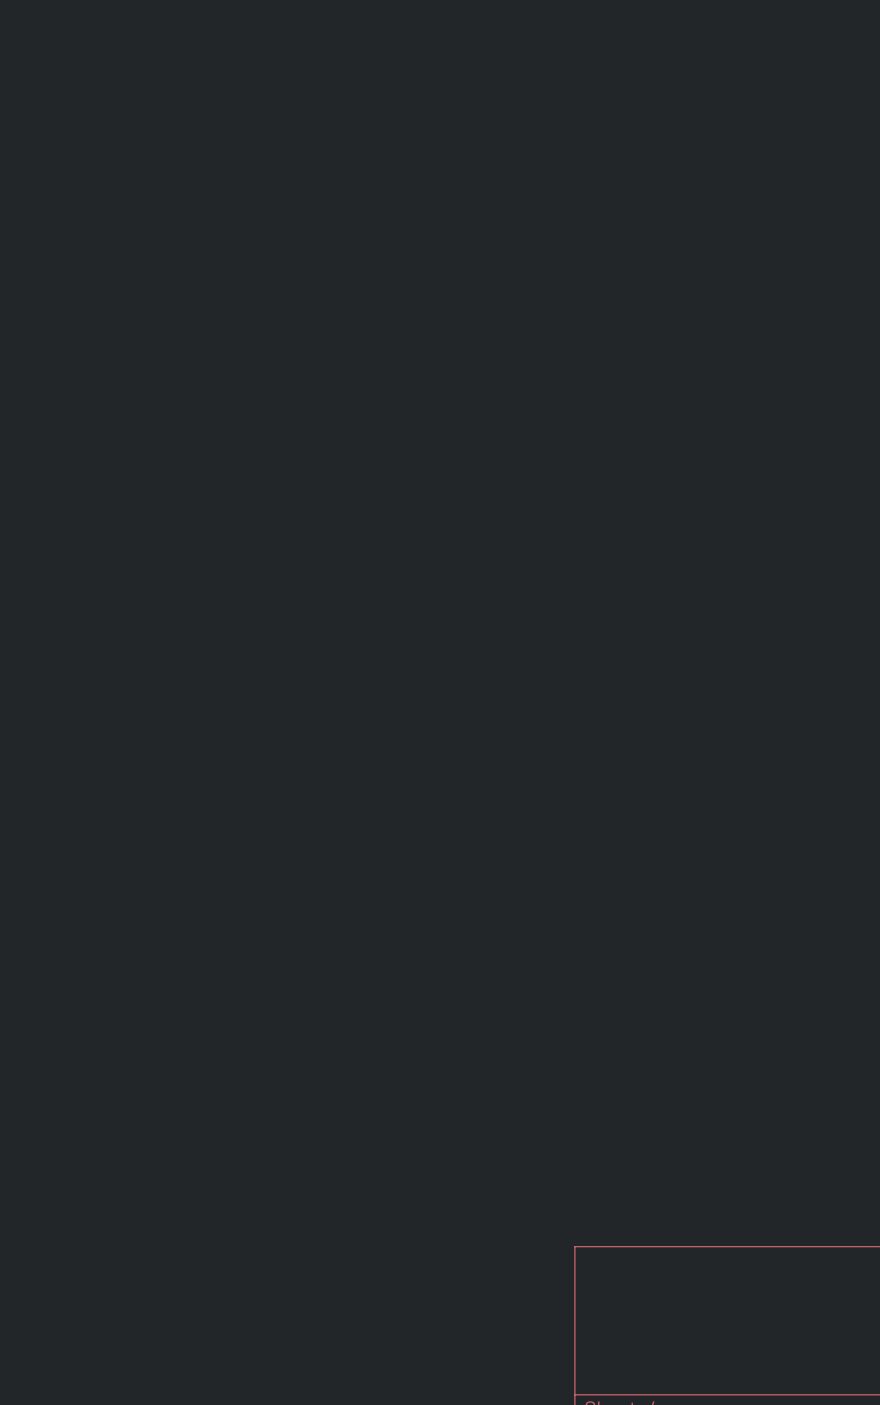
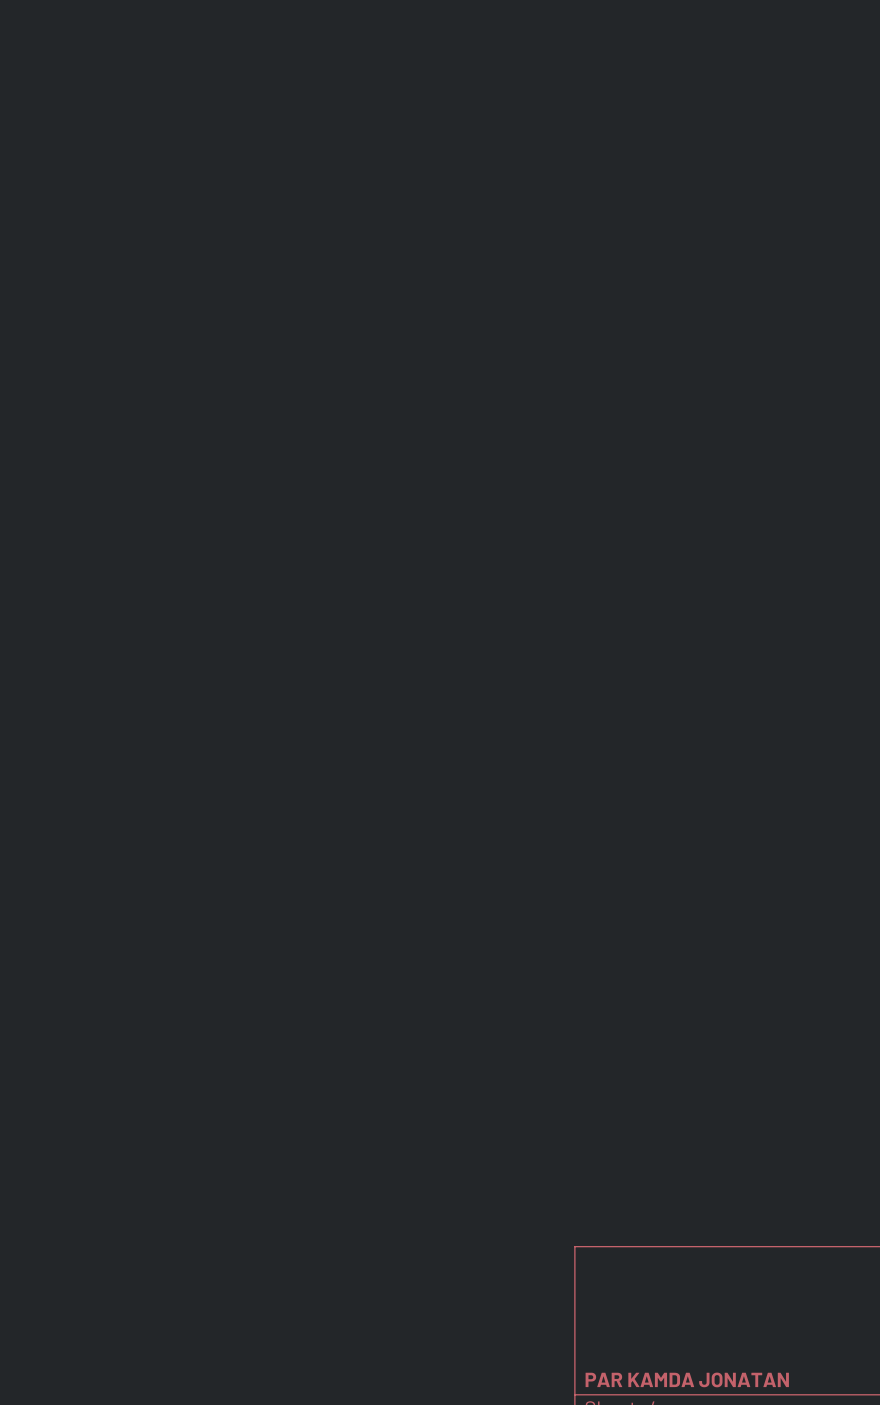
title block: none -> PAR KAMDA JONATAN (687, 1379)

